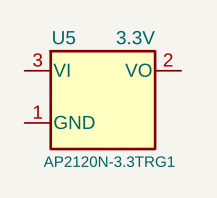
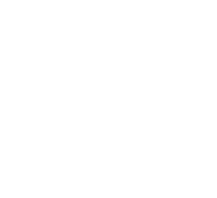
U5: (102, 100) -> none

